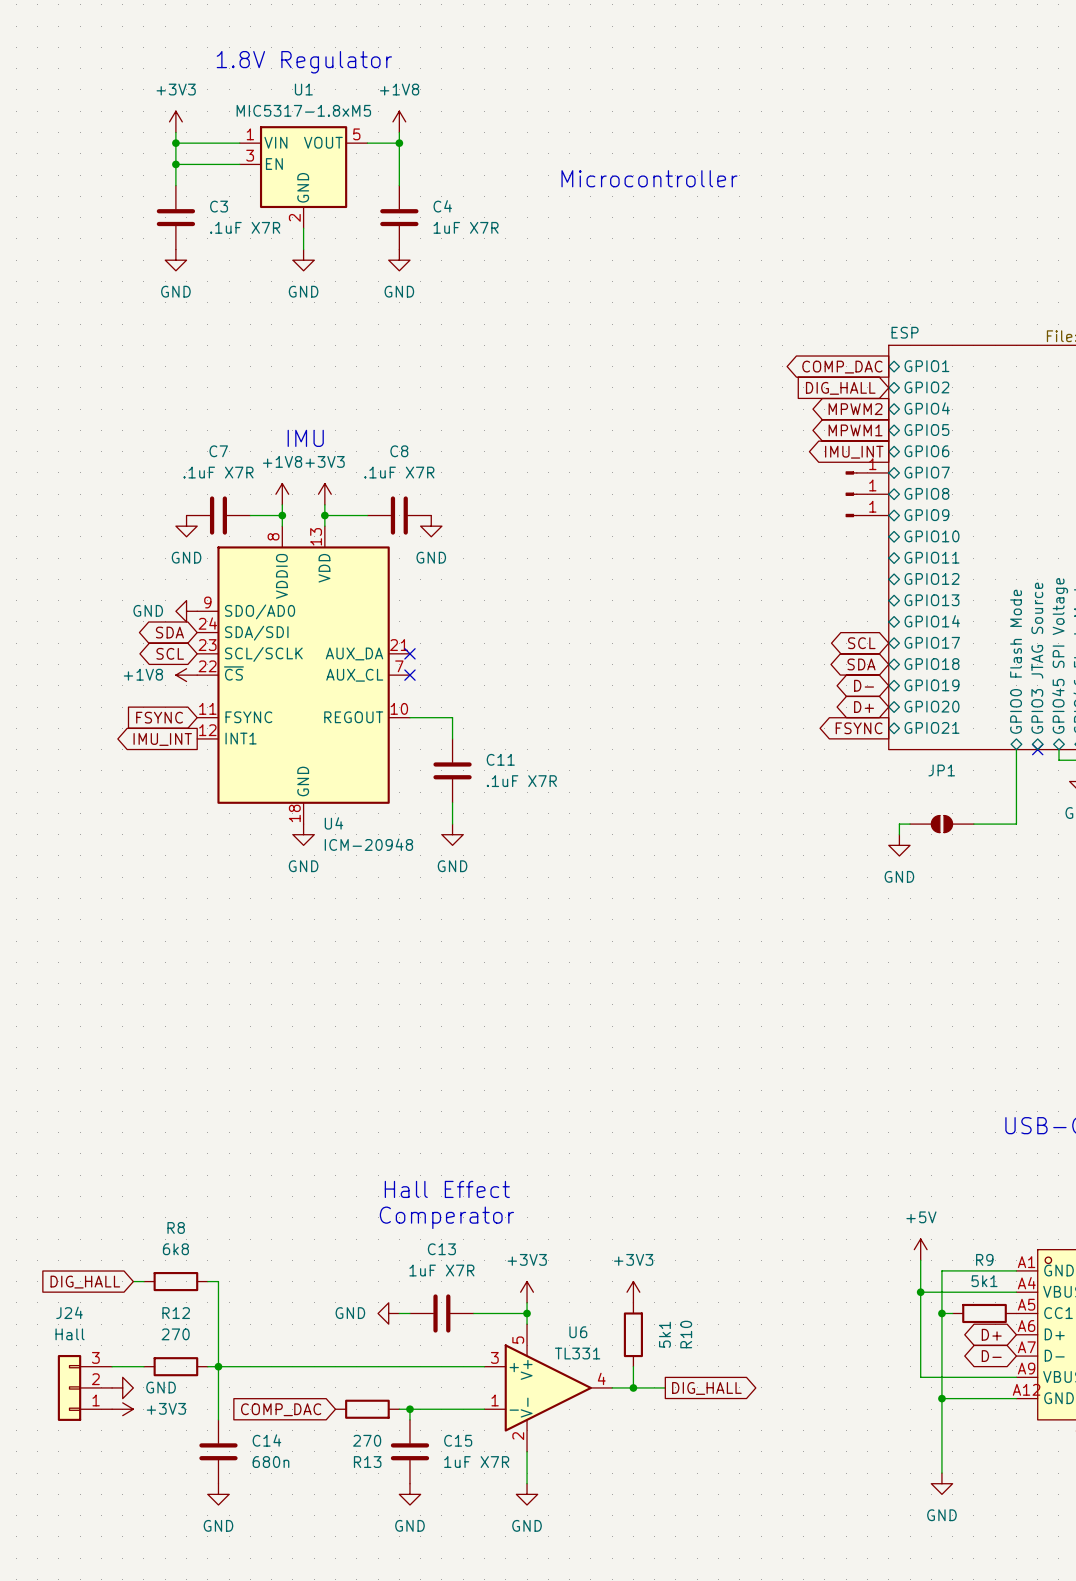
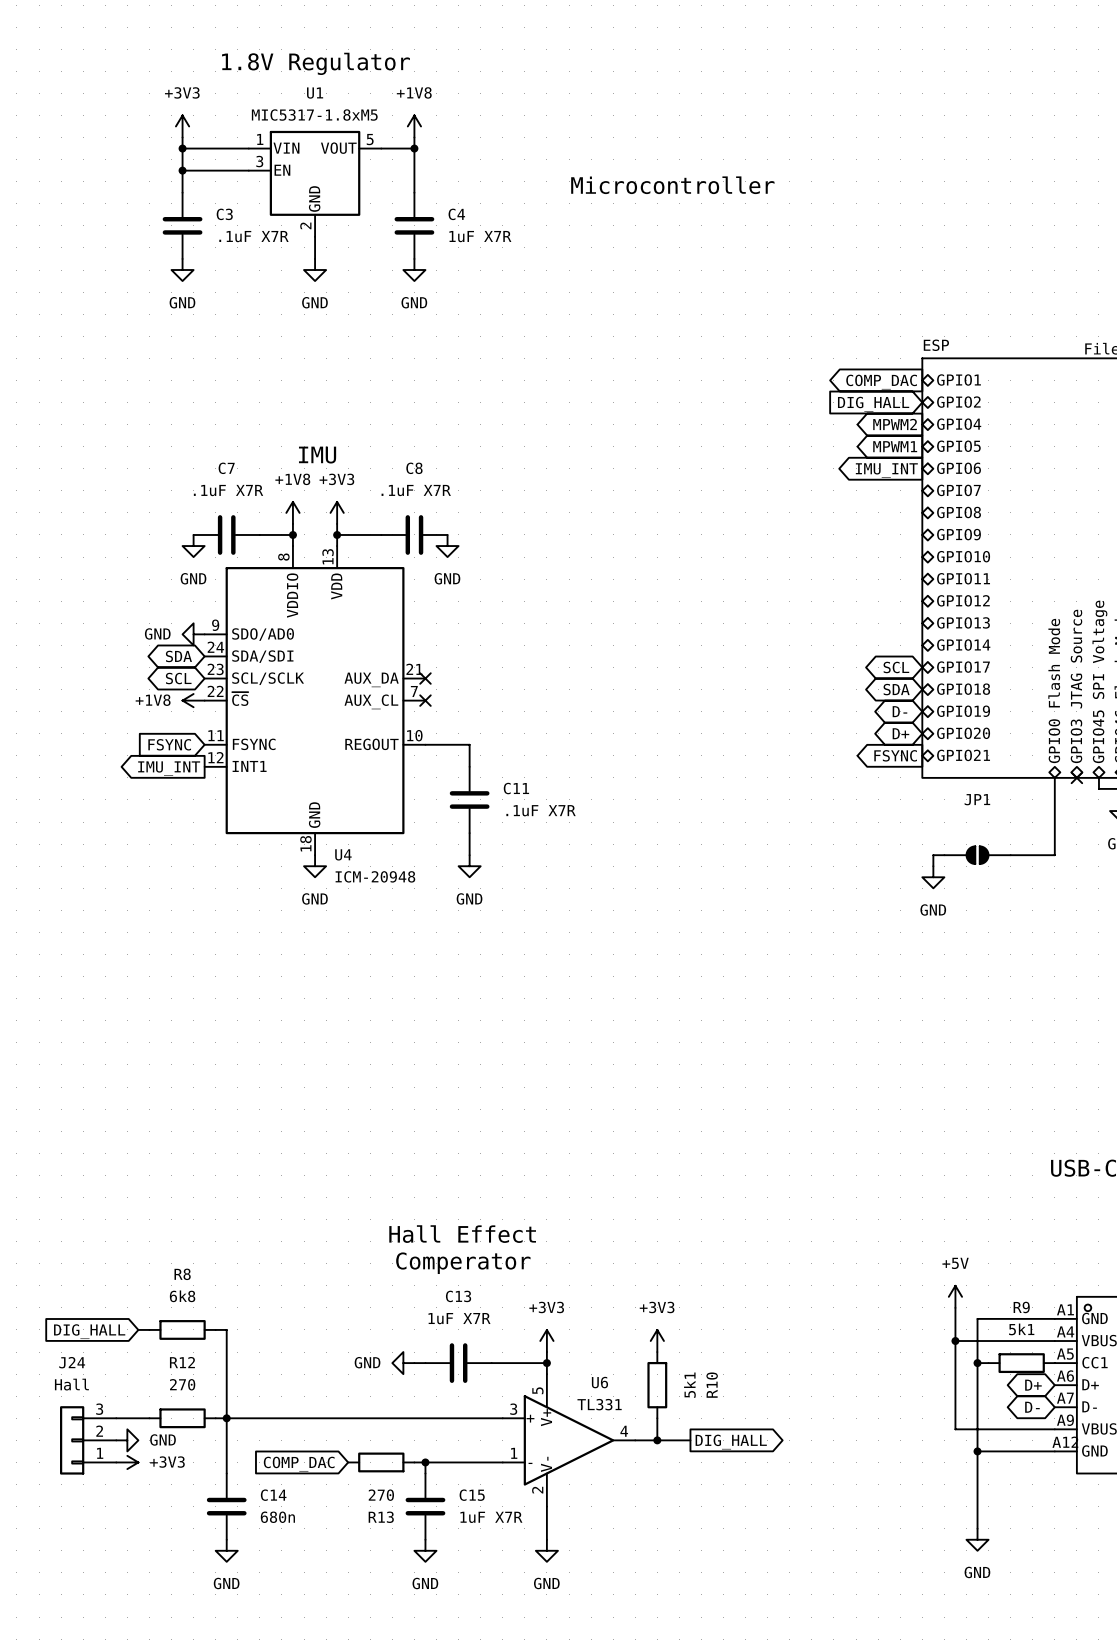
part: (867, 472) -> none
part: (867, 494) -> none
part: (867, 515) -> none

